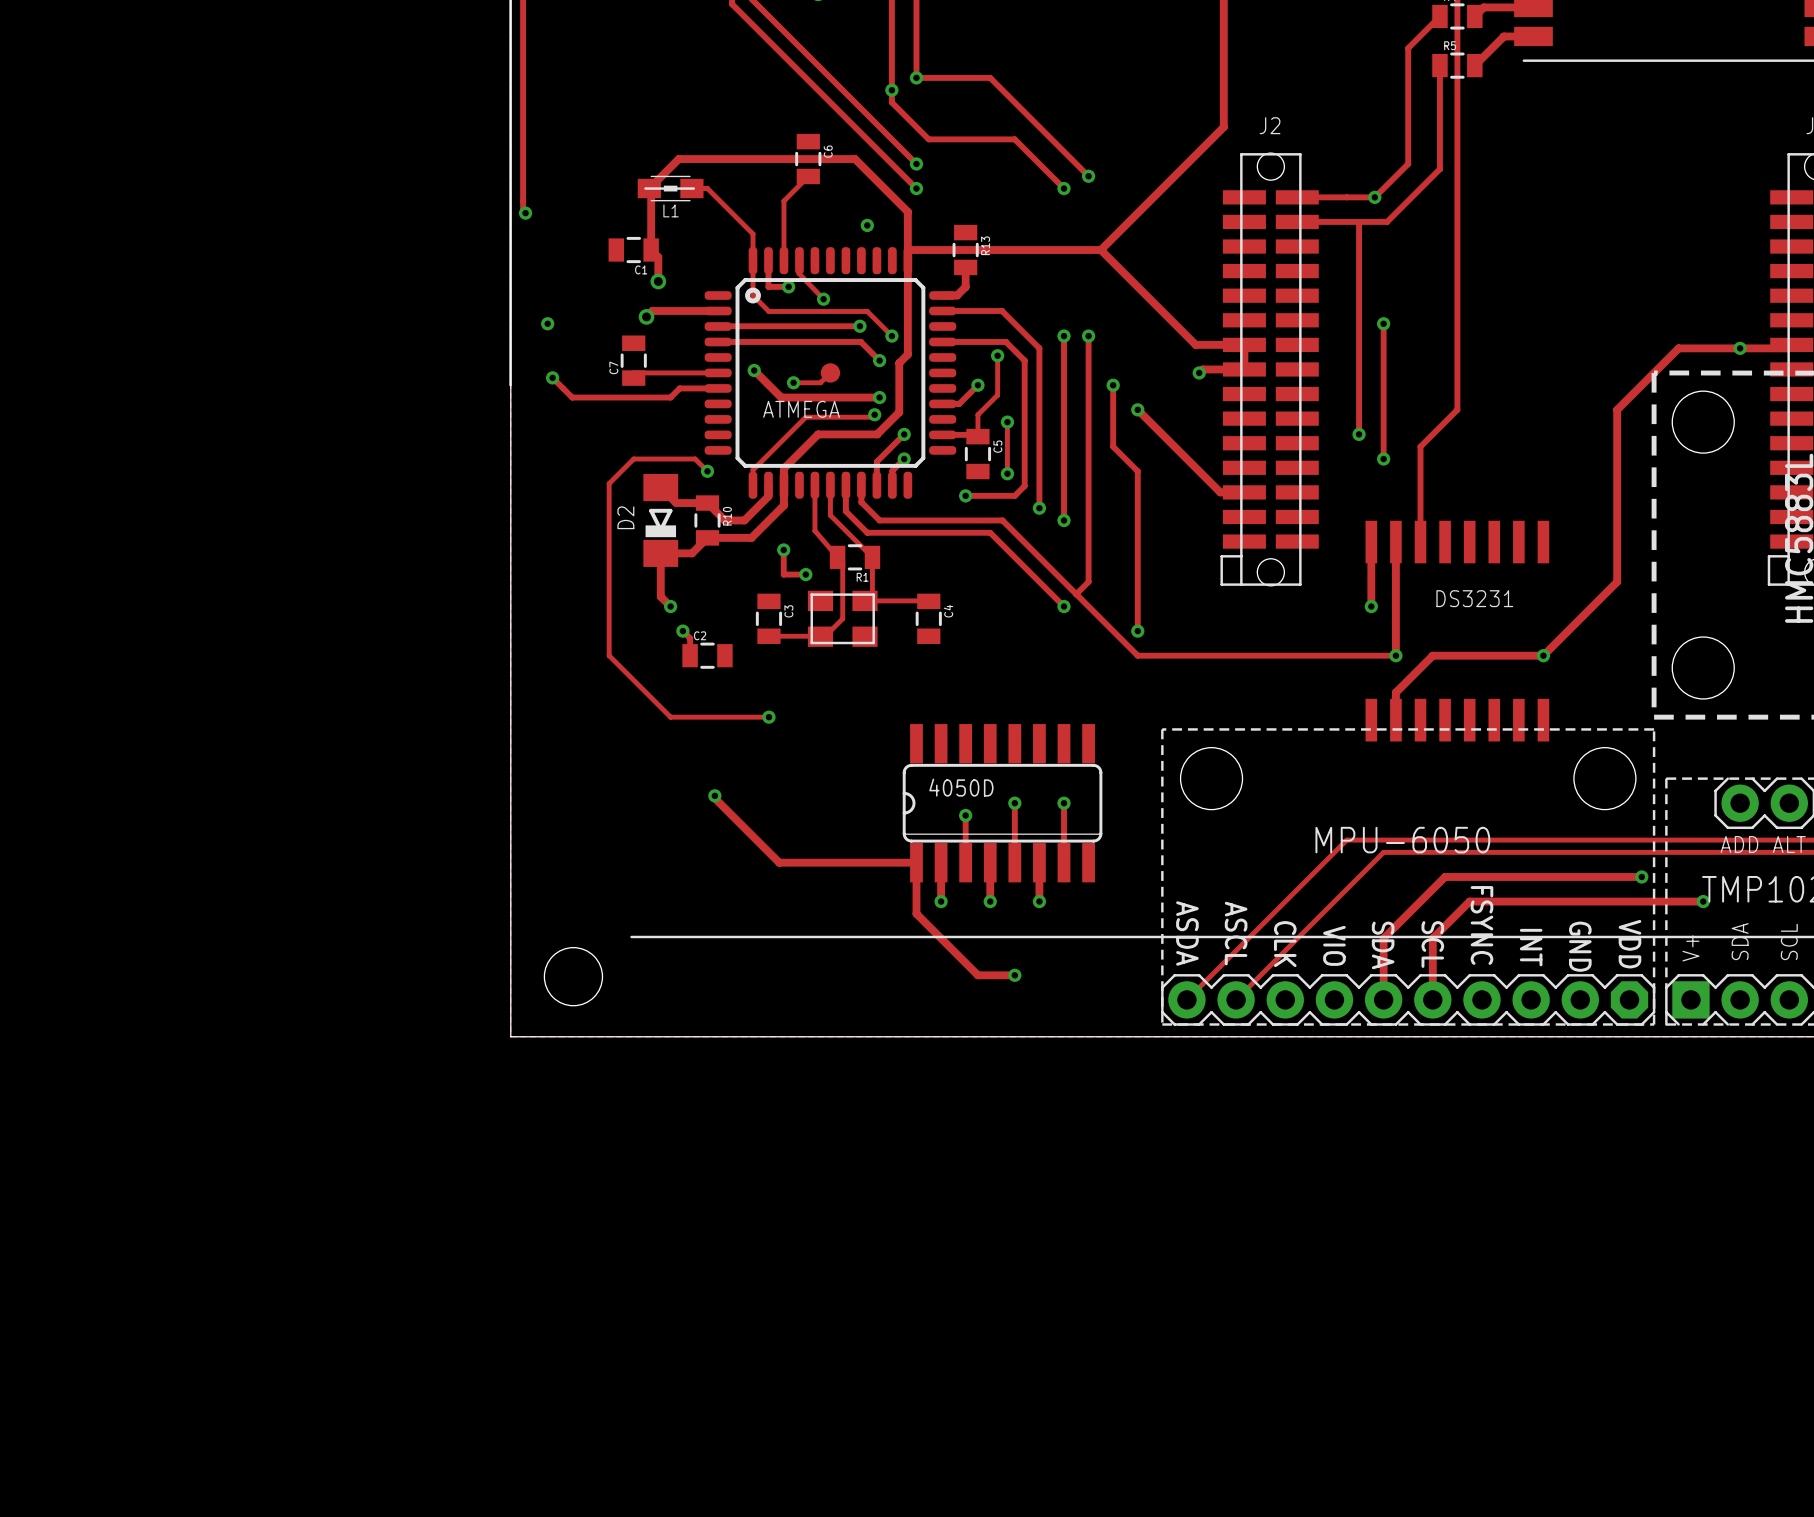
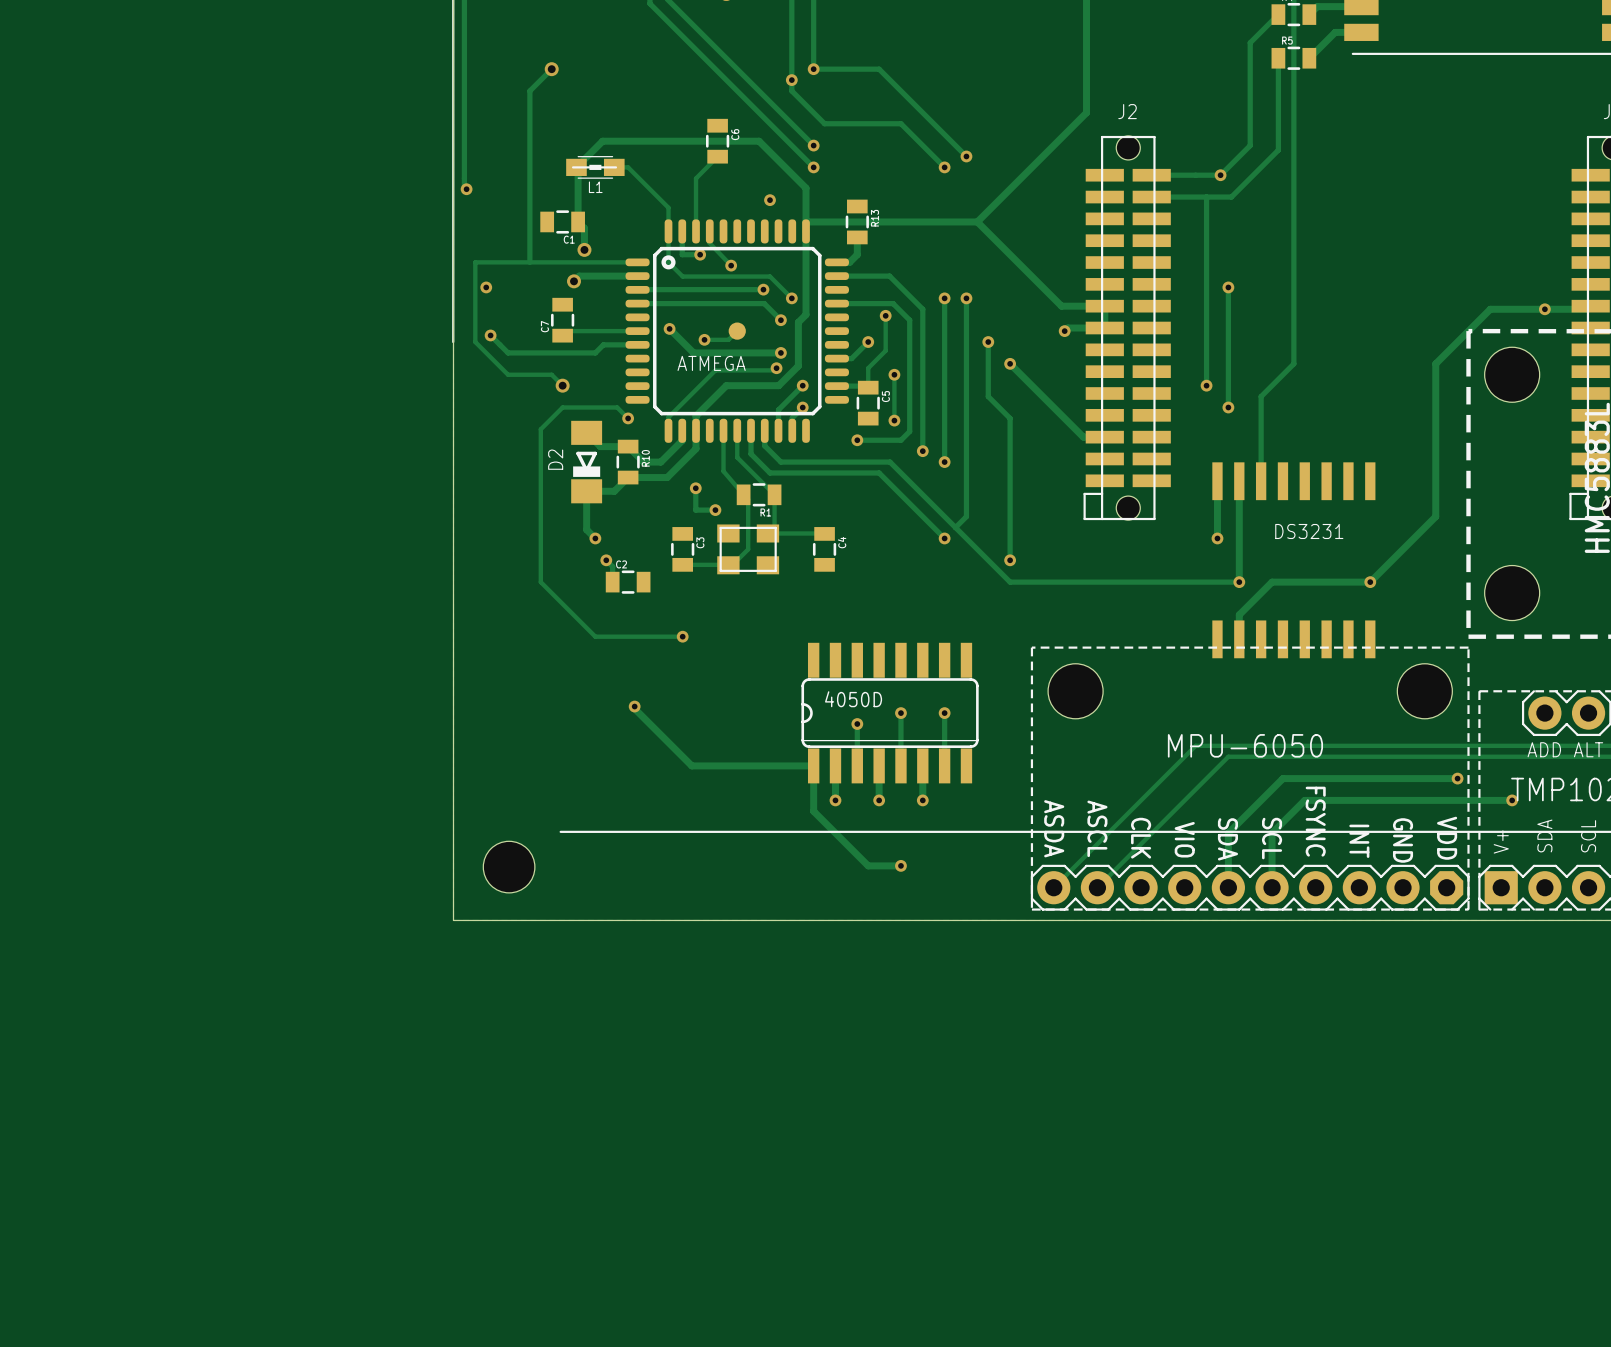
track: none -> (551, 69) (529, 91) (529, 262)
via: none -> (551, 69)
track: none -> (637, 262) (475, 262) (475, 342) (508, 374) (551, 374) (562, 385)
via: none -> (562, 385)

